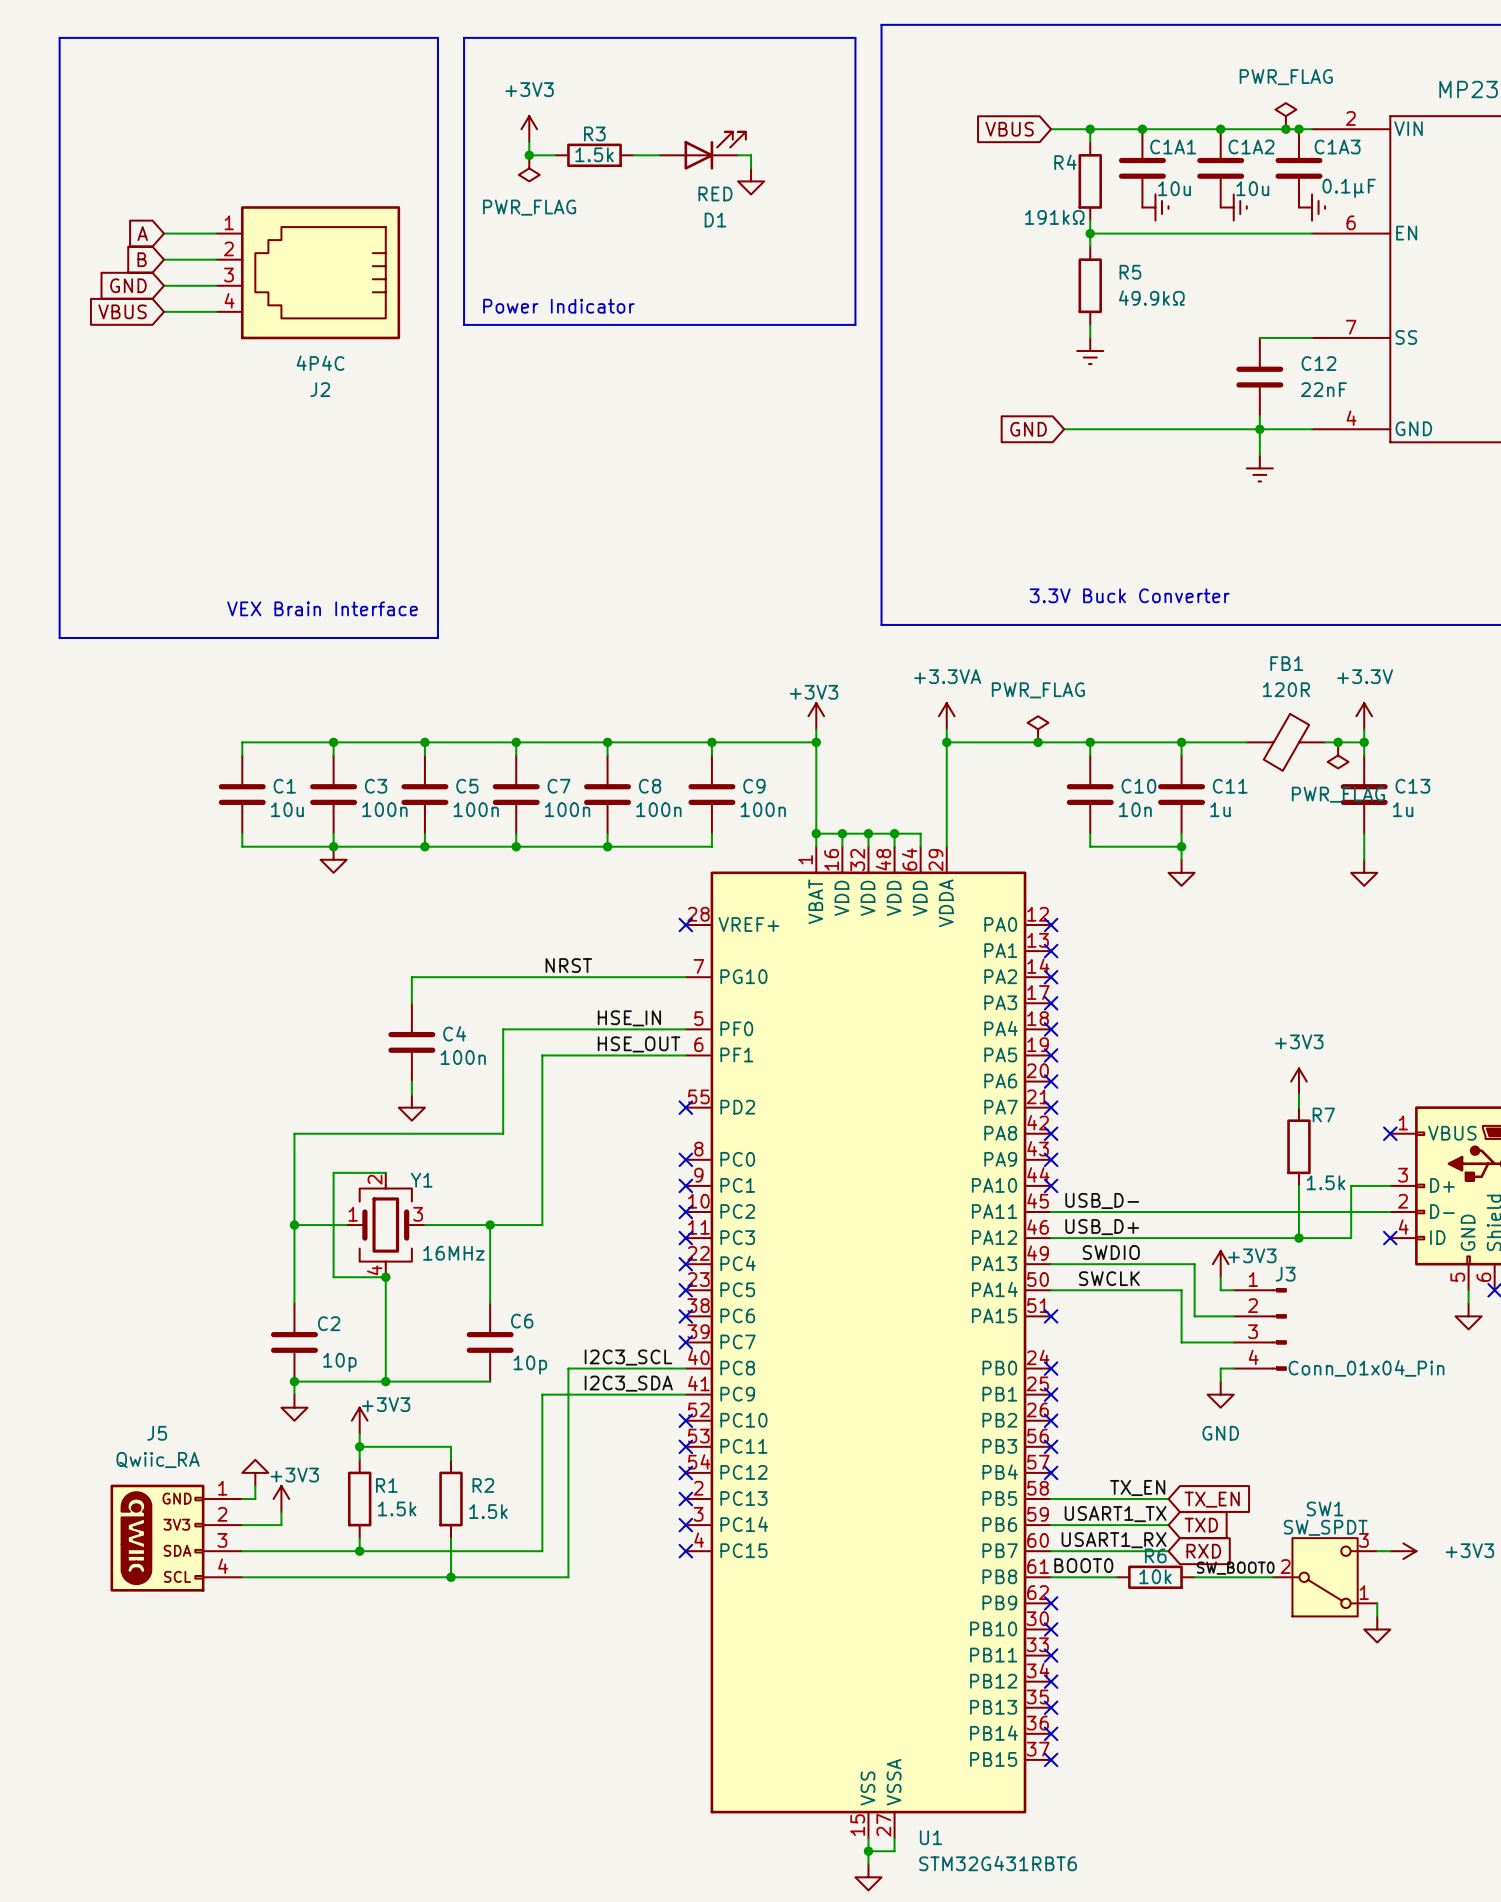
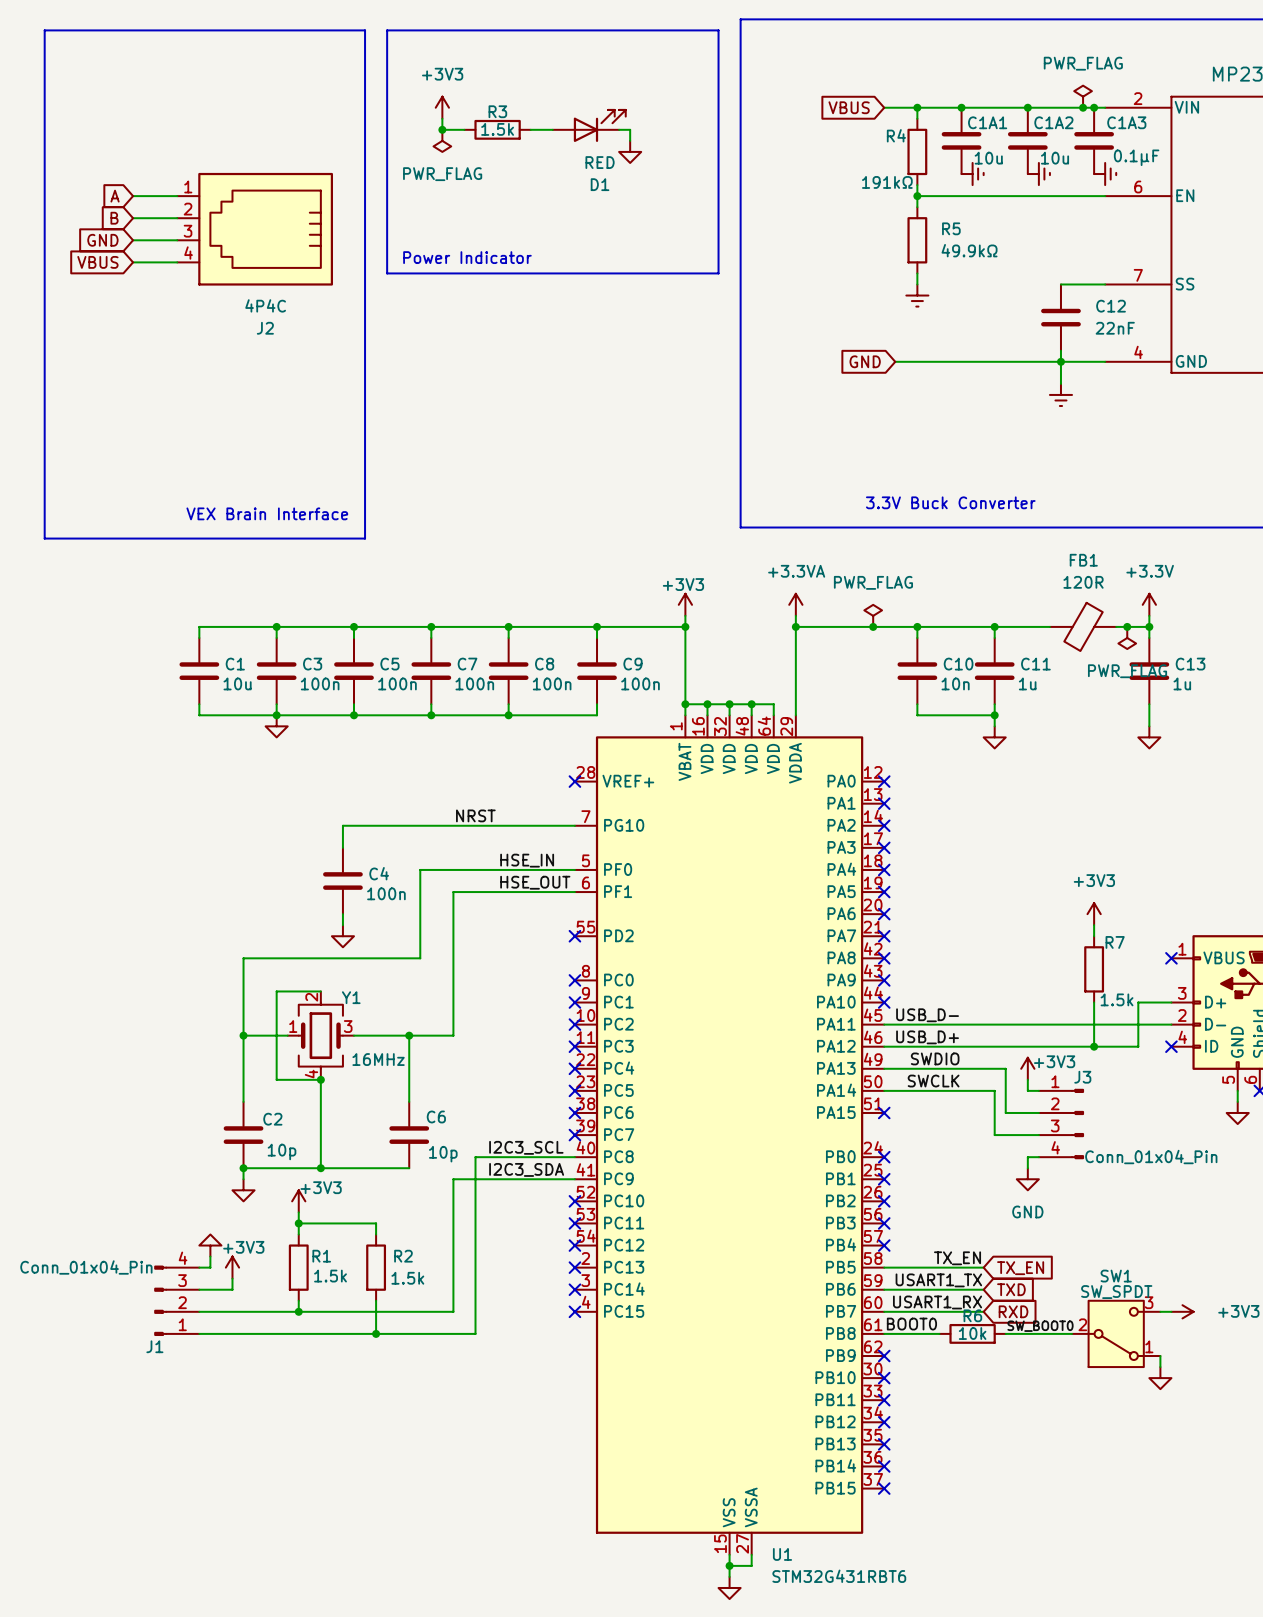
J5: Qwiic_RA (176, 1538) -> none
J1: none -> Conn_01x04_Pin (176, 1300)

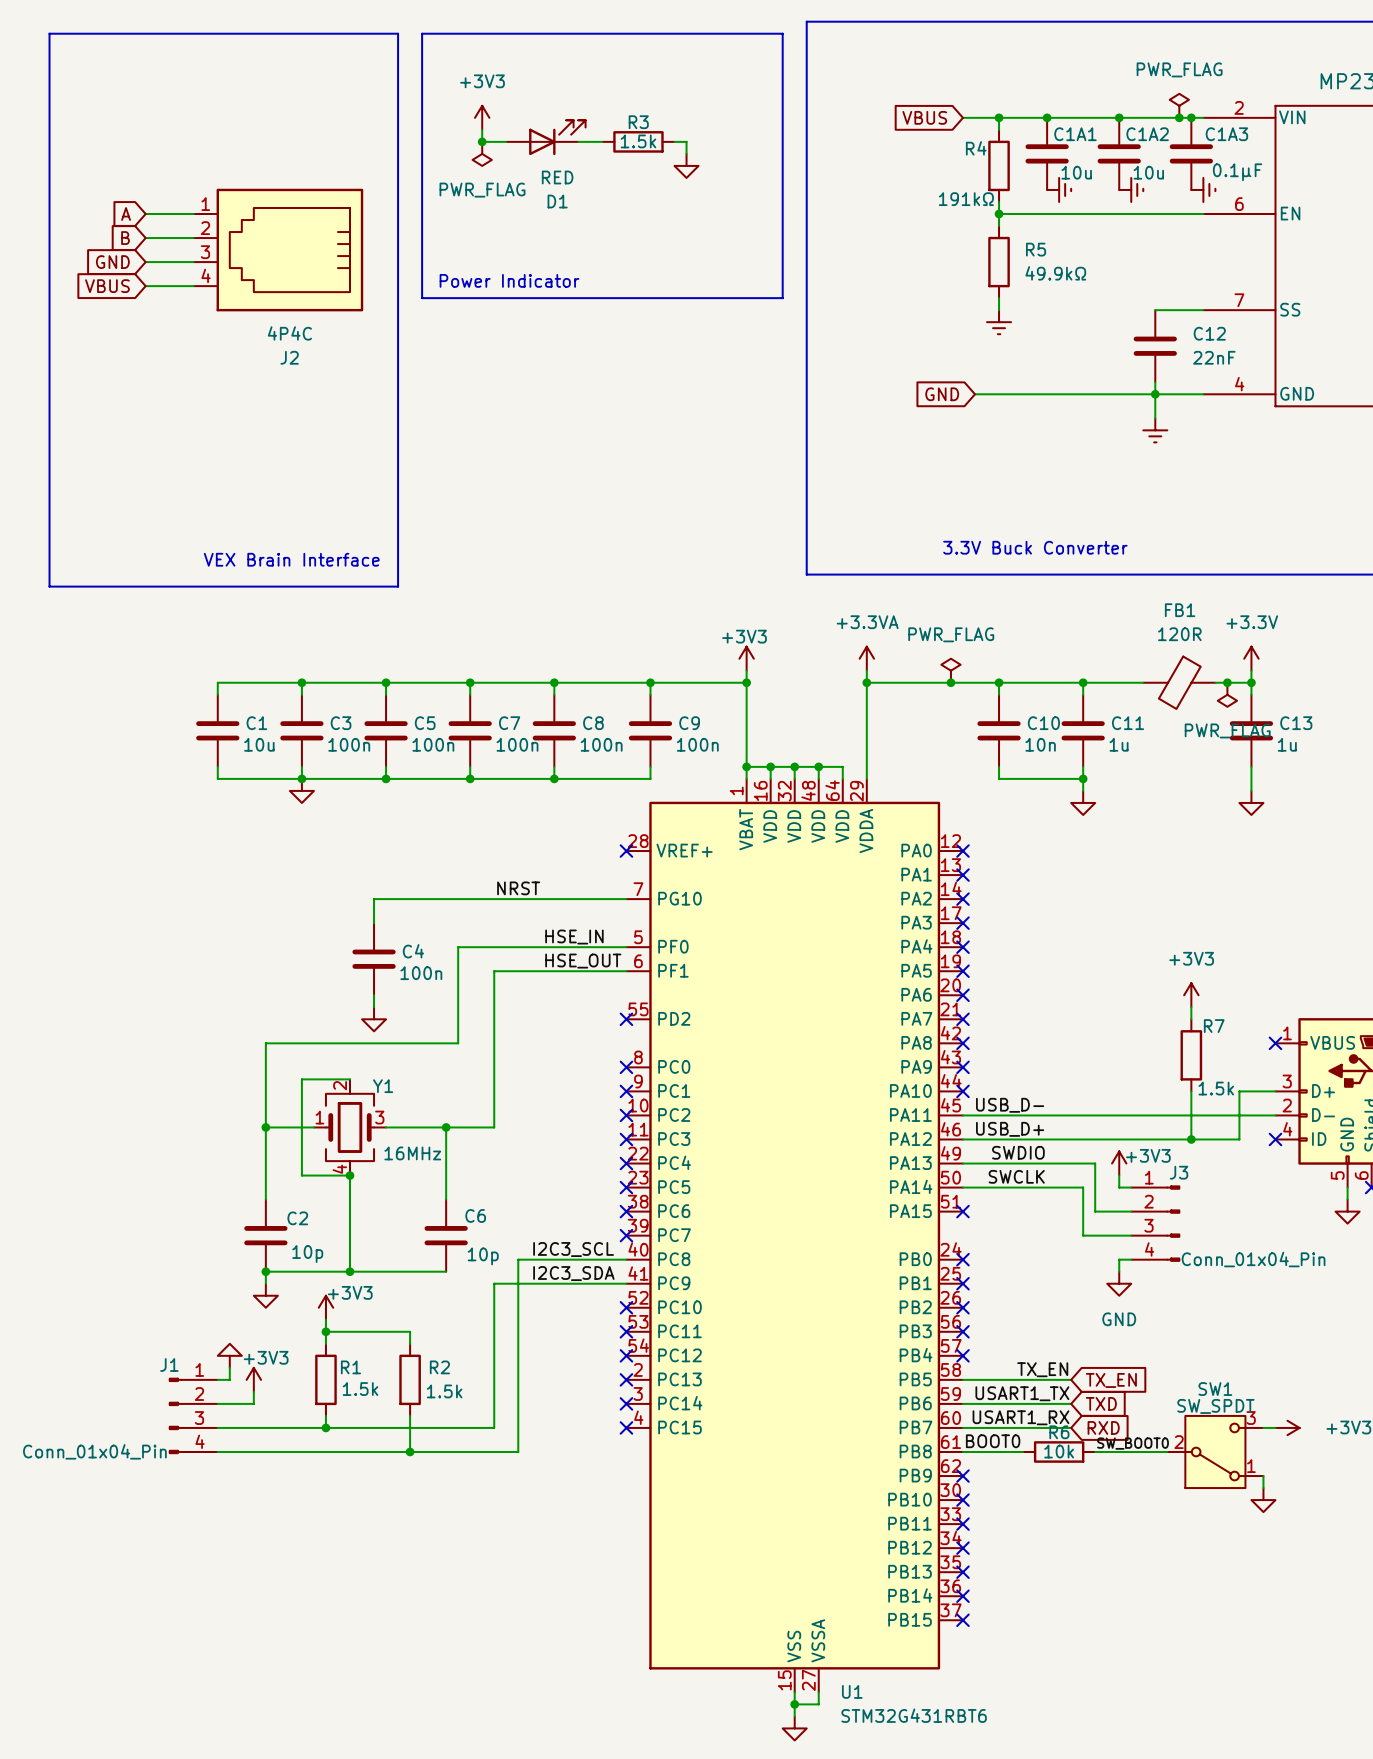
D1 position: (589, 125) -> (545, 137)
R3 position: (497, 129) -> (638, 141)
J1 flip: as is (160, 1300) -> up-down (175, 1415)

